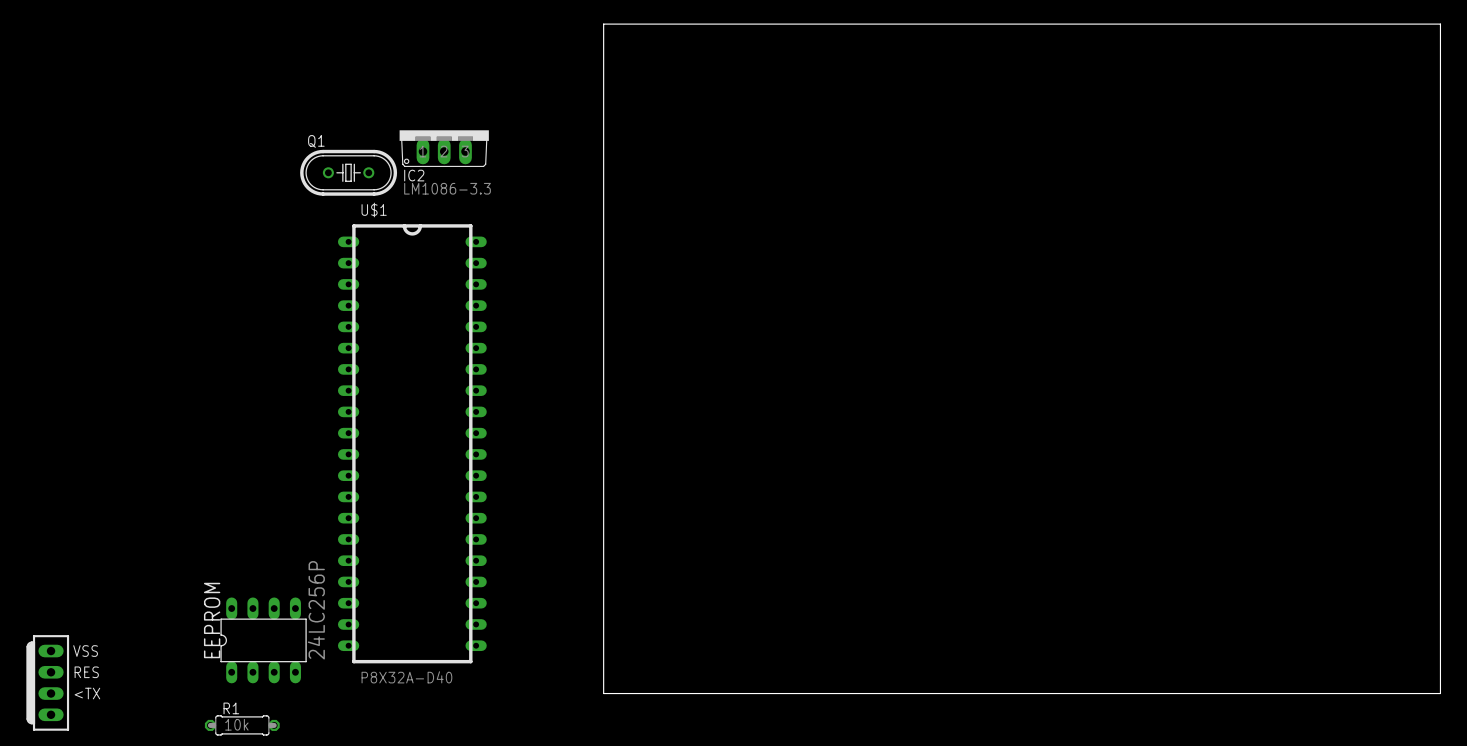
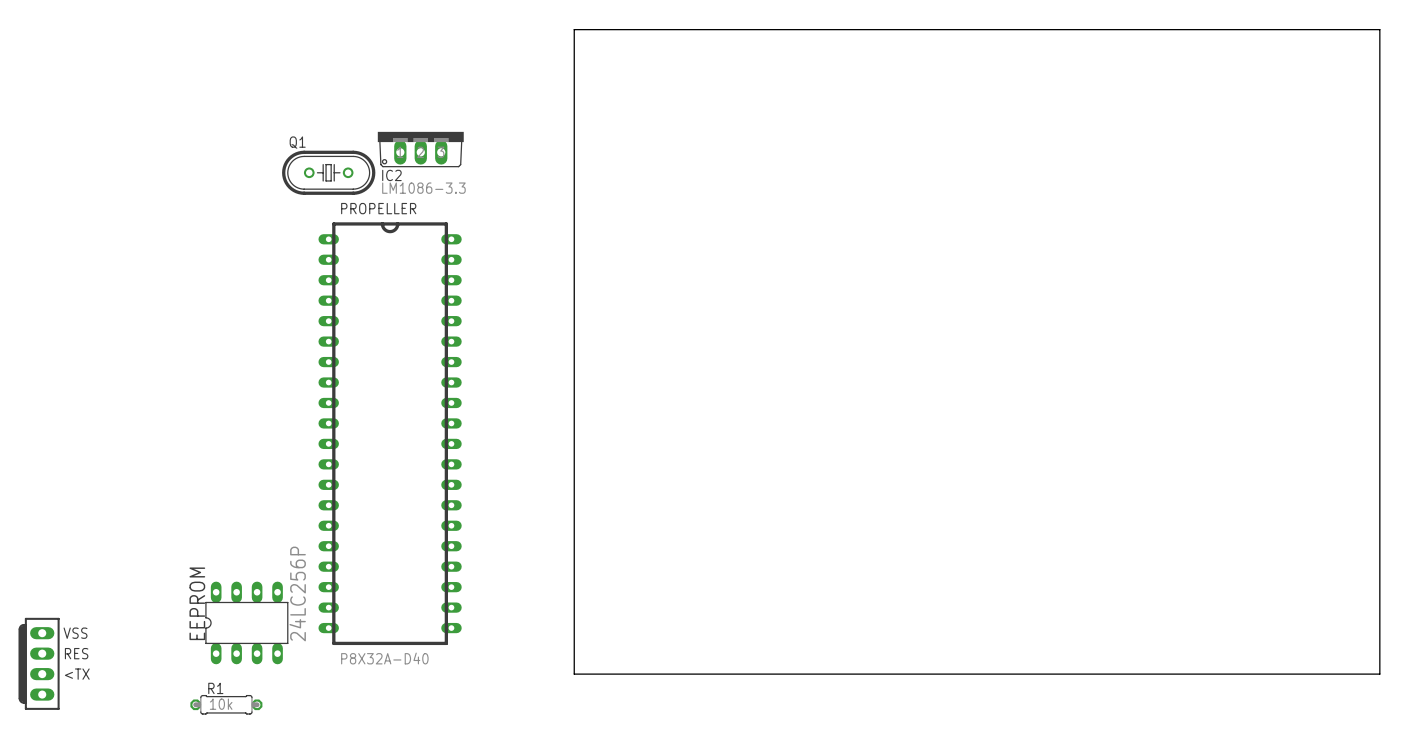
U$1 name: U$1 (374, 209) -> PROPELLER (378, 208)

